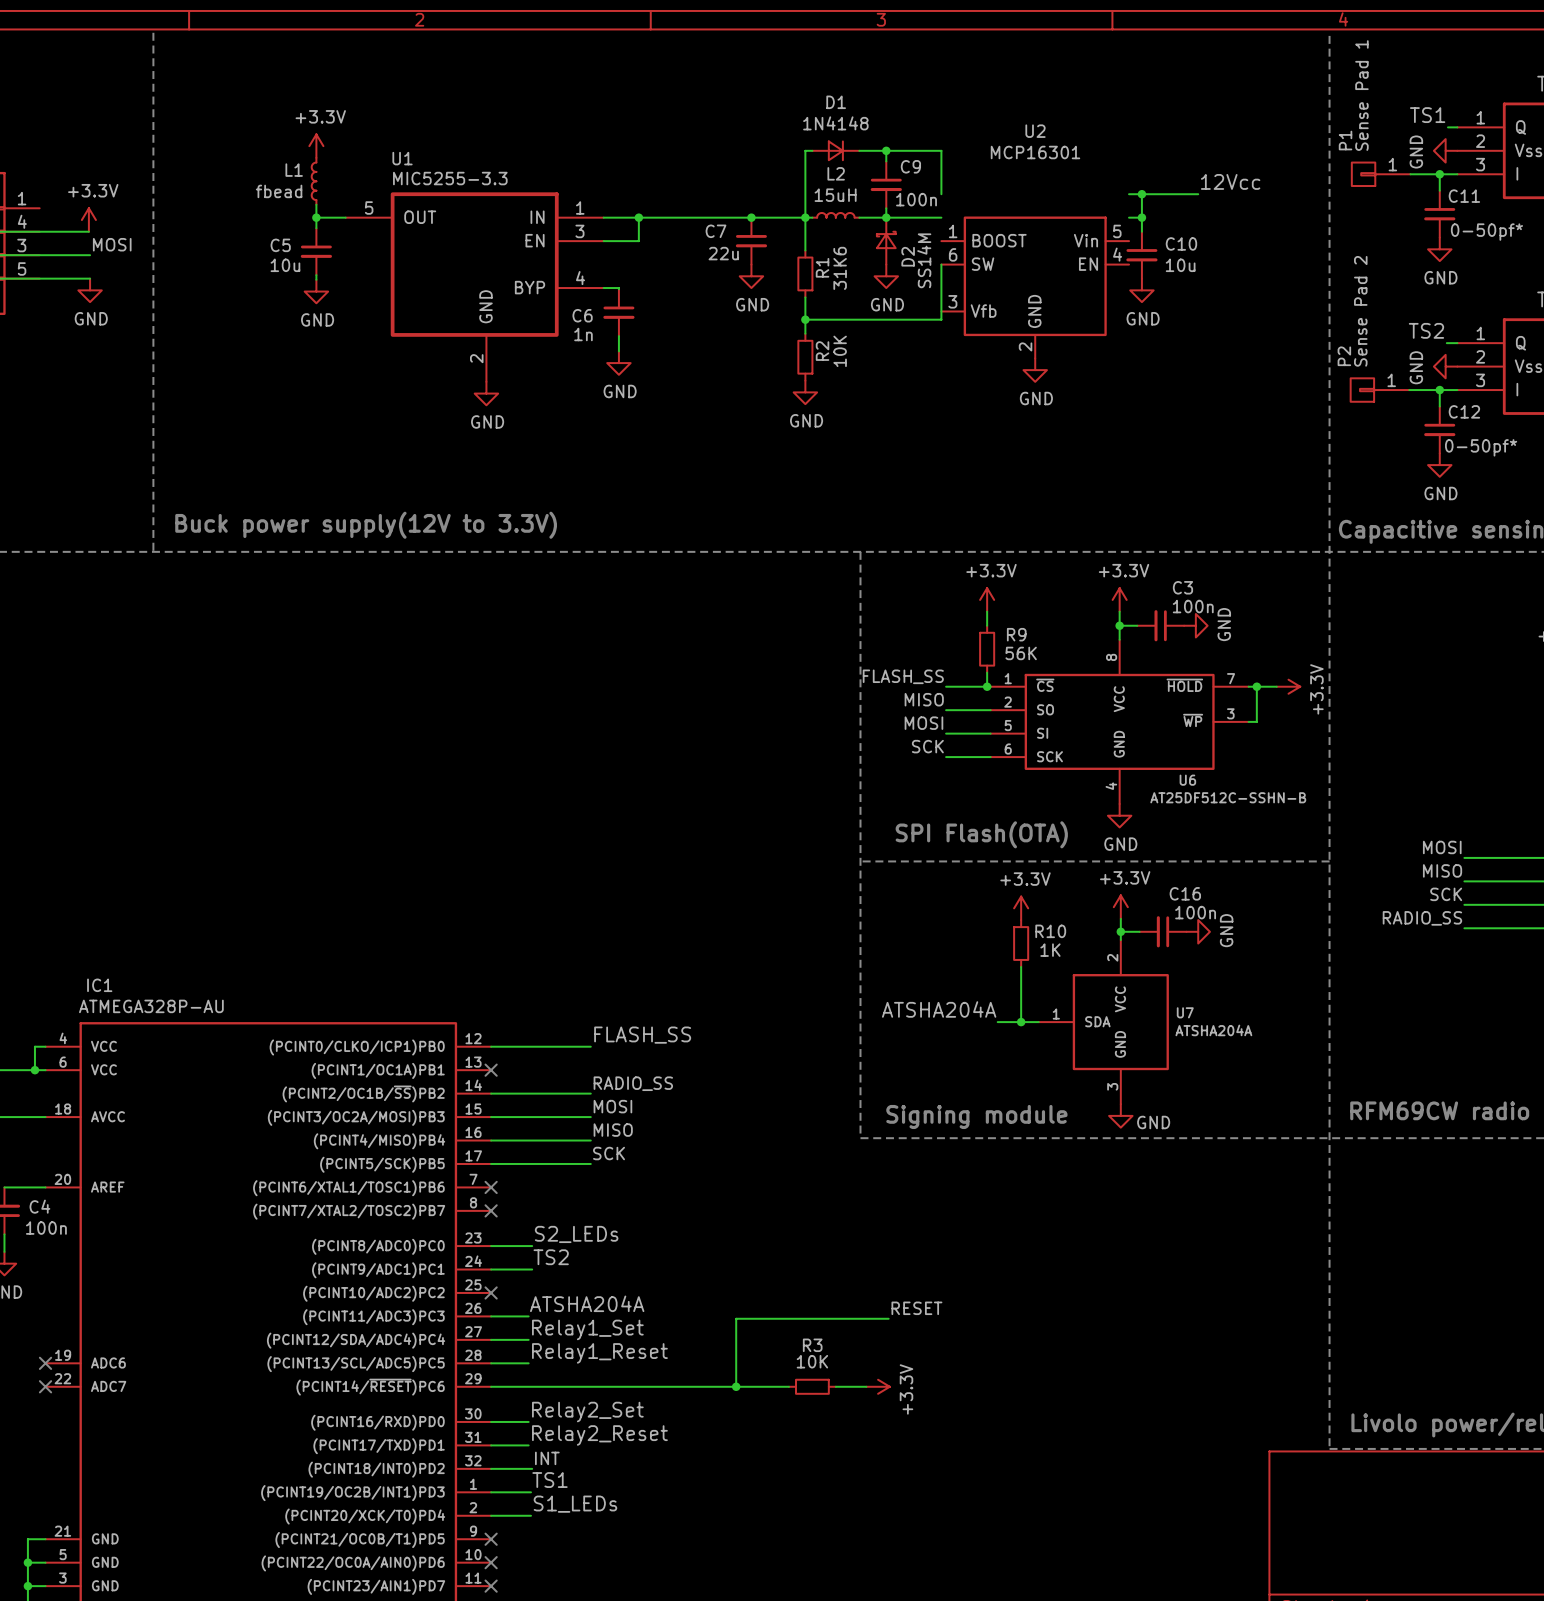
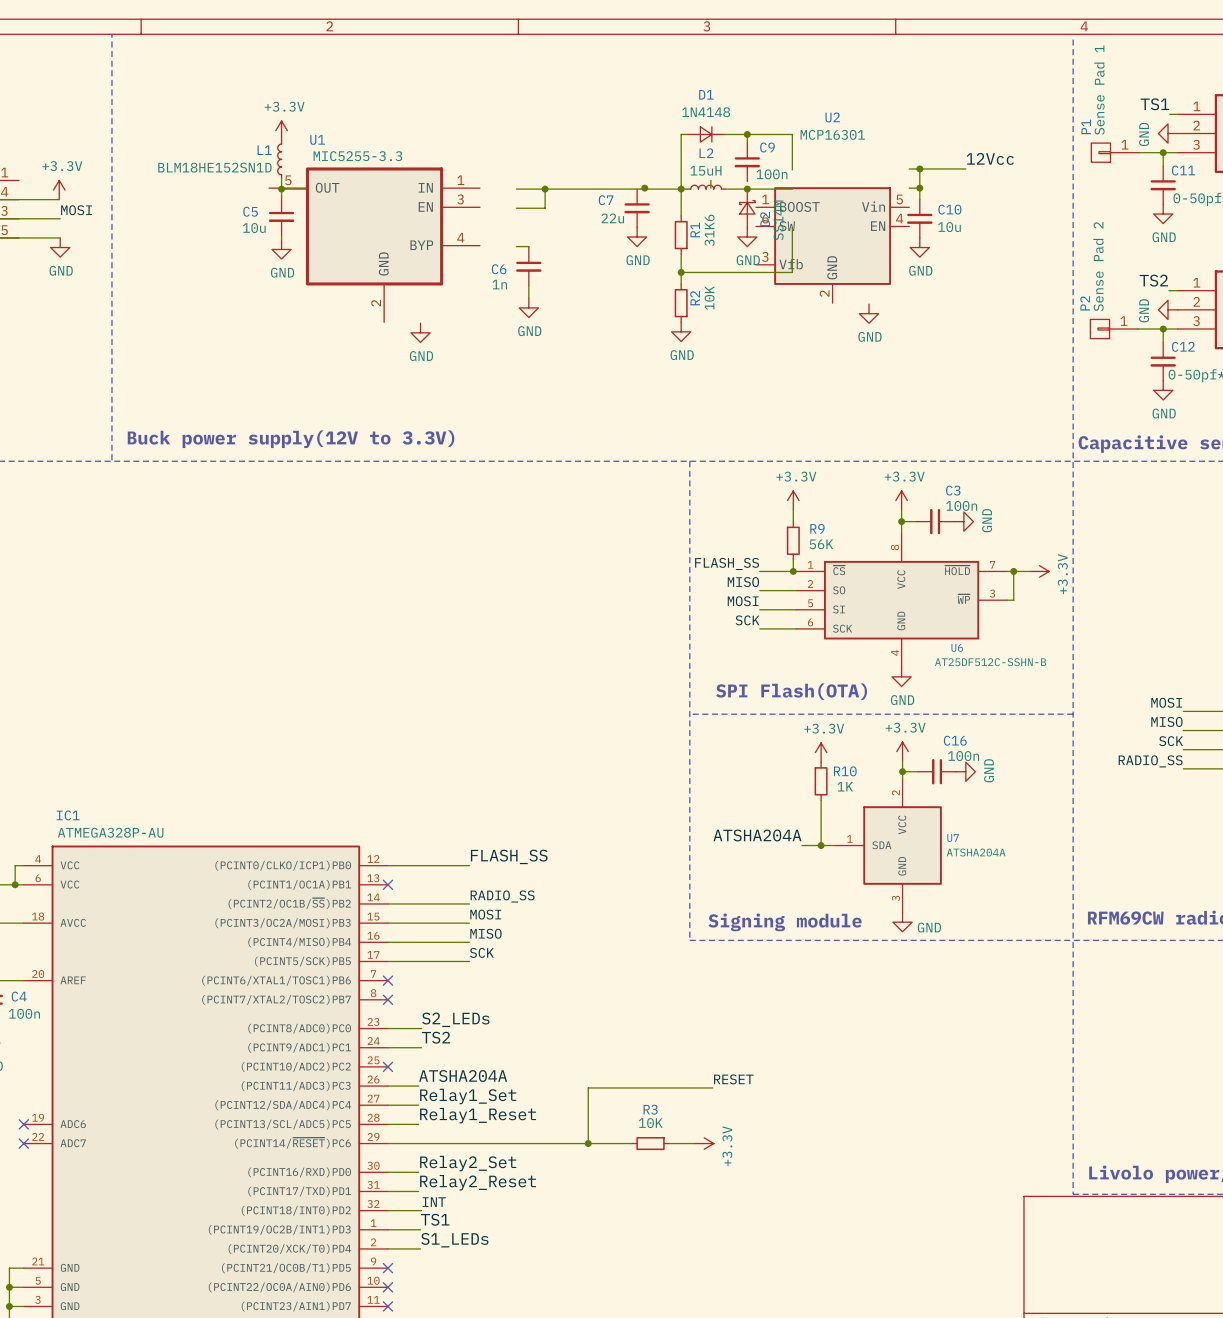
power symbol position: +3.3V (316, 146) -> +3.3V (281, 130)
wire: (812, 150) (805, 150) (805, 250) -> (686, 134) (681, 134) (681, 215)
D1 position: (835, 150) -> (706, 134)
wire: (859, 150) (941, 150) (941, 194) -> (725, 134) (792, 134) (792, 169)
junction: (886, 150) -> none
junction: none -> (747, 134)
L1 position: (314, 181) -> (279, 159)
C9 position: (886, 184) -> (747, 162)
L1 value: fbead (279, 191) -> BLM18HE152SN1D (214, 167)
wire: (316, 204) (316, 228) -> (281, 178) (281, 197)
L2 position: (835, 215) -> (706, 187)
wire: (316, 217) (345, 217) -> (281, 189) (305, 189)
junction position: (316, 217) -> (281, 189)
wire: (603, 217) (812, 217) -> (516, 189) (686, 189)
wire: (638, 217) (638, 241) (603, 241) -> (545, 189) (545, 208) (516, 208)
junction: (638, 217) -> none
junction: (751, 217) -> none
wire: (859, 217) (941, 217) -> (725, 189) (792, 189)
junction: (886, 217) -> none
junction: none -> (545, 189)
junction: none -> (681, 189)
junction: none -> (747, 189)
C7 position: (751, 241) -> (637, 208)
D2 position: (886, 241) -> (747, 208)
C5 position: (316, 251) -> (281, 216)
wire: (941, 264) (941, 319) (805, 319) -> (792, 227) (792, 272) (681, 272)
R1 position: (805, 273) -> (681, 235)
wire: (316, 275) (316, 279) -> (281, 236) (281, 239)
power symbol position: GND (751, 276) -> GND (637, 237)
power symbol position: GND (886, 276) -> GND (747, 237)
wire: (603, 288) (618, 289) -> (516, 246) (528, 247)
power symbol position: GND (316, 291) -> GND (281, 249)
wire: (805, 297) (805, 333) -> (681, 254) (681, 283)
C6 position: (618, 312) -> (528, 266)
junction position: (805, 319) -> (681, 272)
wire: (618, 336) (618, 351) -> (528, 285) (528, 298)
R2 position: (805, 357) -> (681, 303)
power symbol position: GND (618, 363) -> GND (528, 307)
power symbol position: GND (1035, 370) -> GND (869, 313)
power symbol position: GND (805, 392) -> GND (681, 331)
power symbol position: GND (486, 393) -> GND (420, 332)

